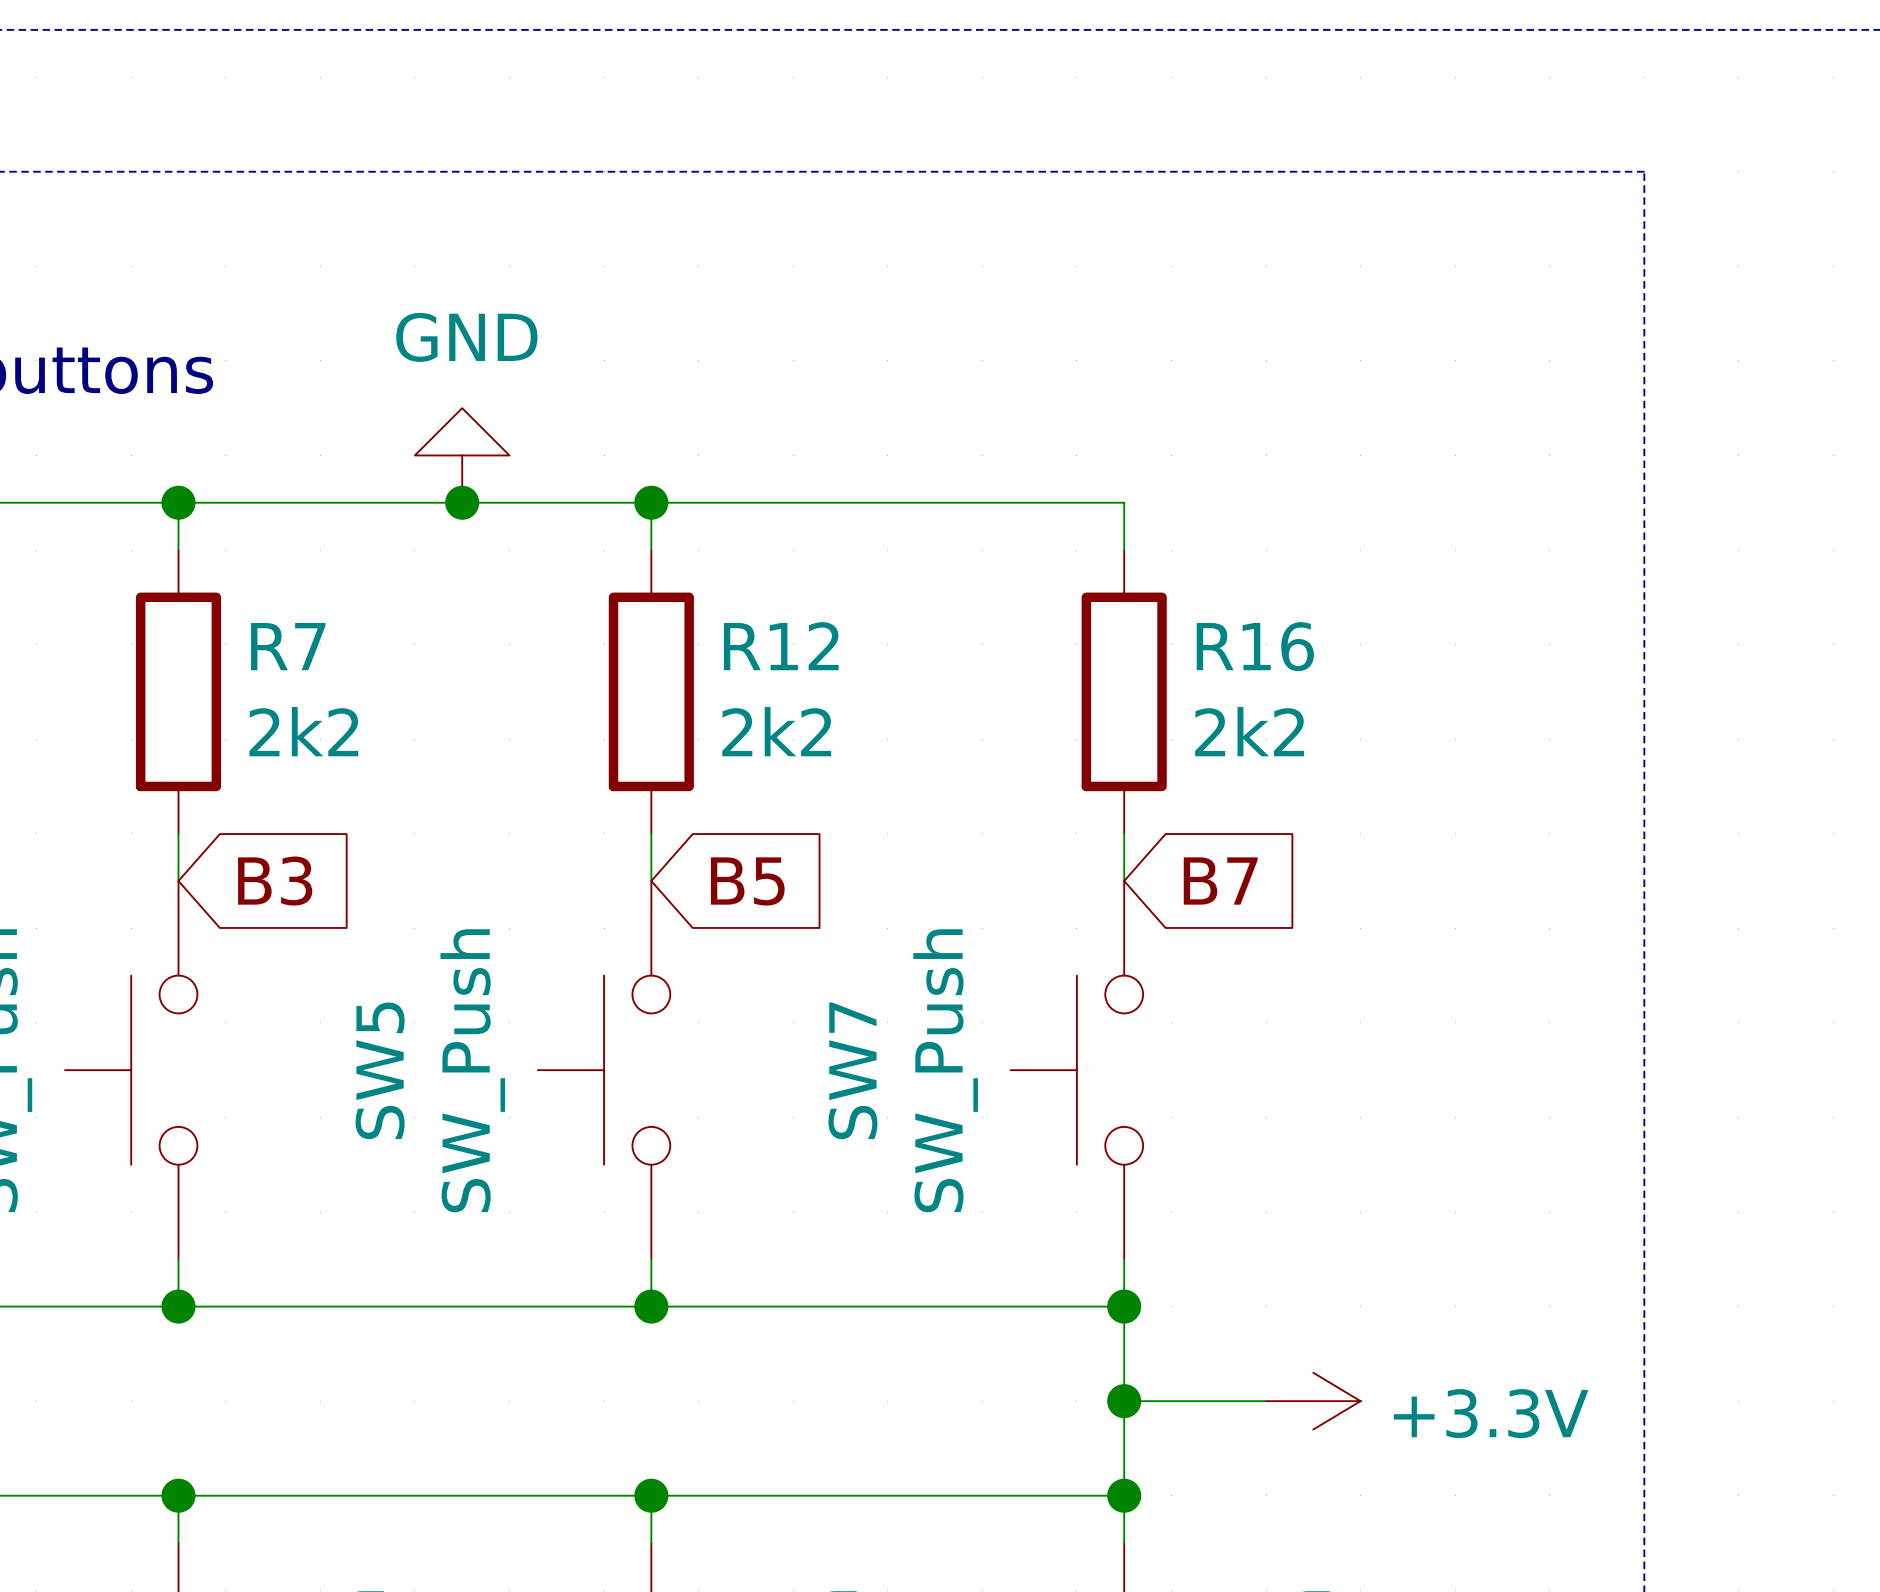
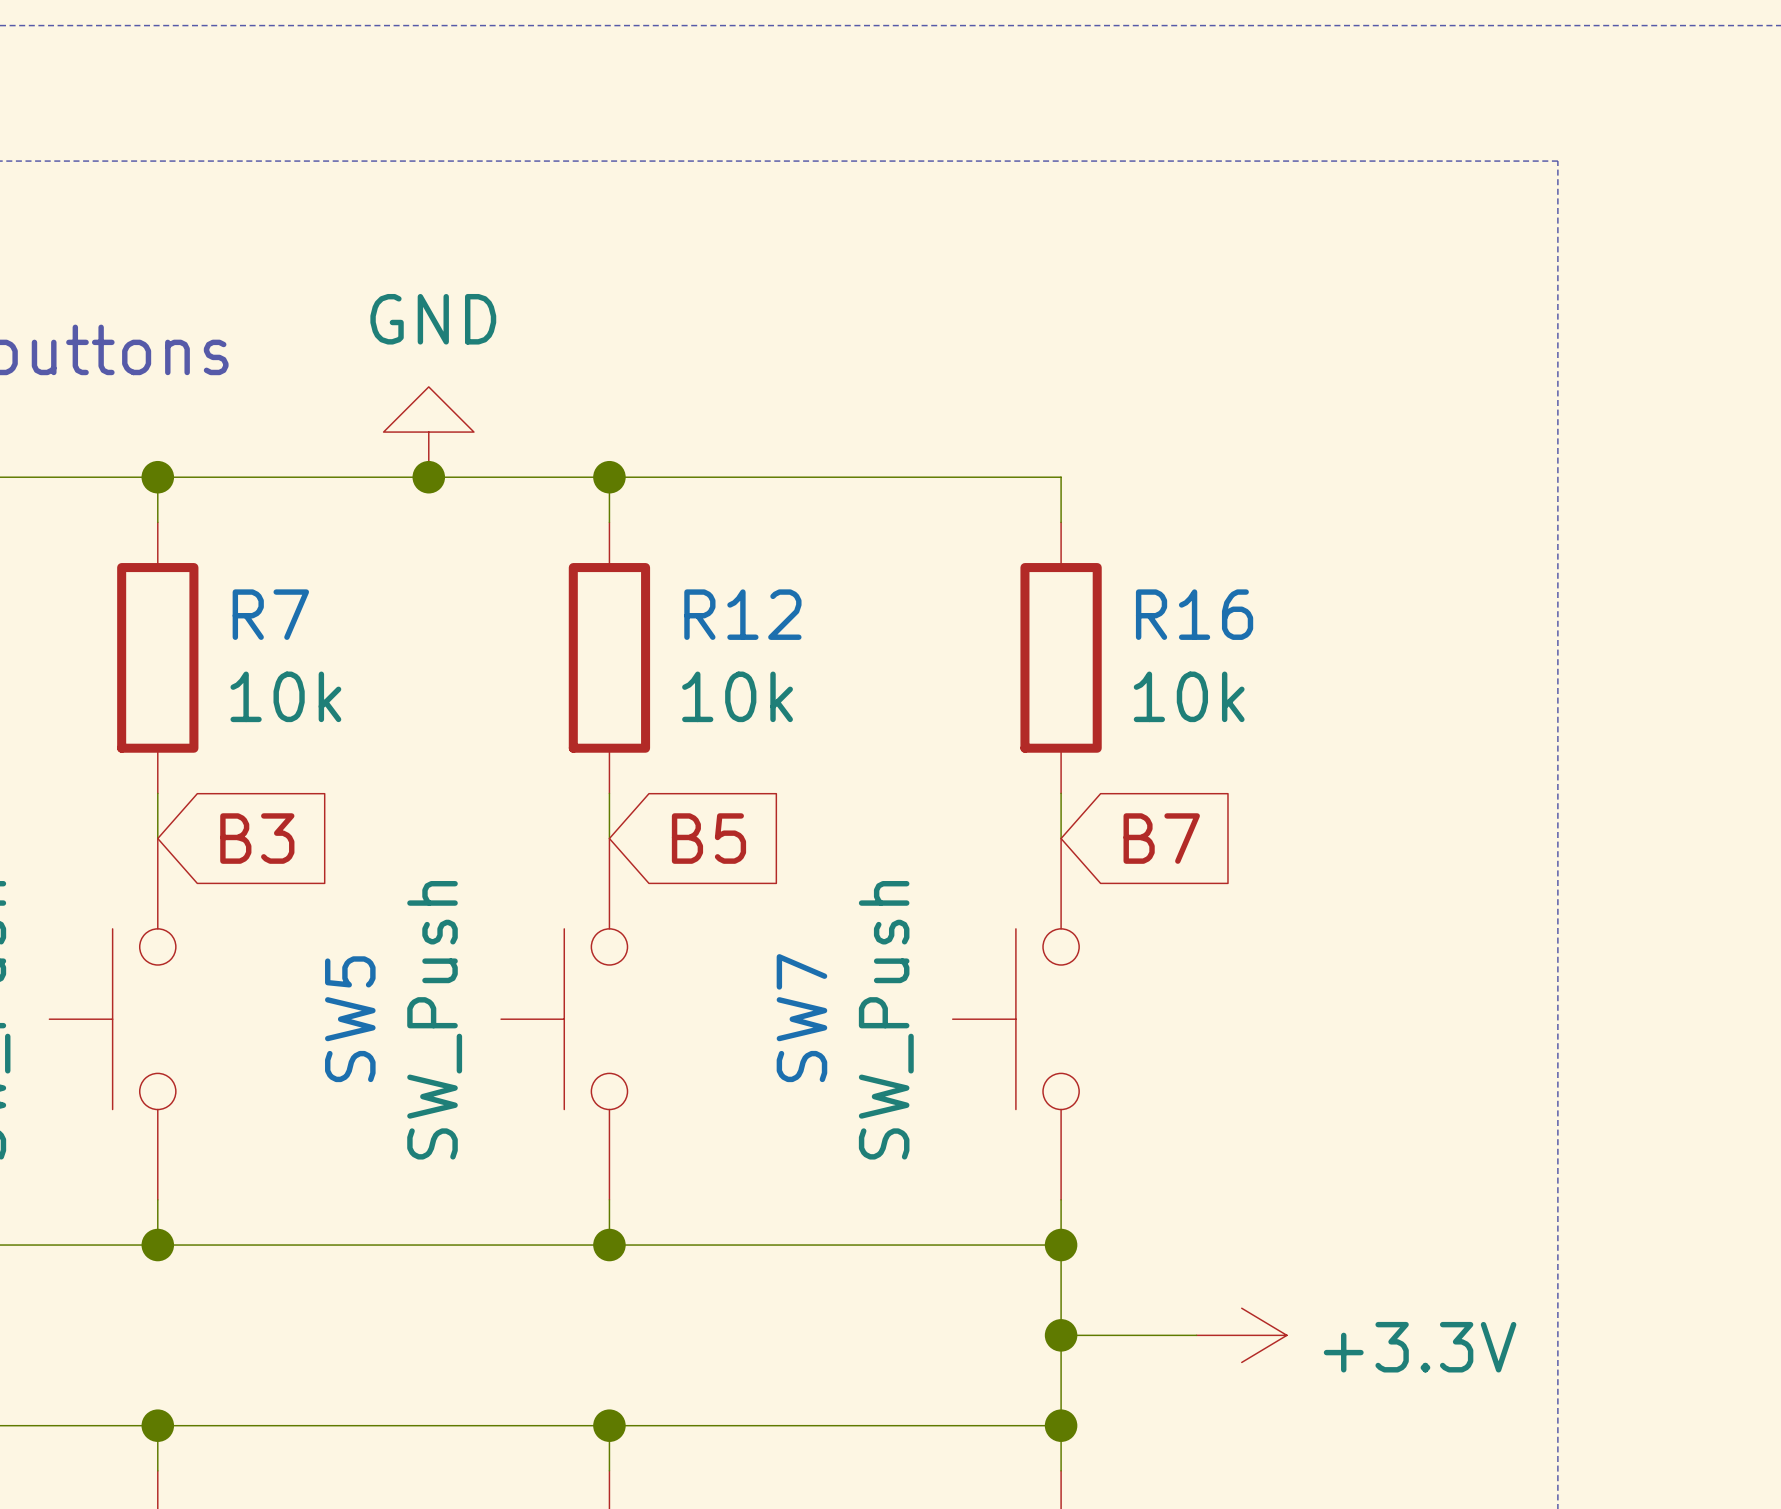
R7 value: 2k2 (303, 731) -> 10k (285, 696)
R12 value: 2k2 (776, 731) -> 10k (737, 696)
R16 value: 2k2 (1249, 731) -> 10k (1189, 696)

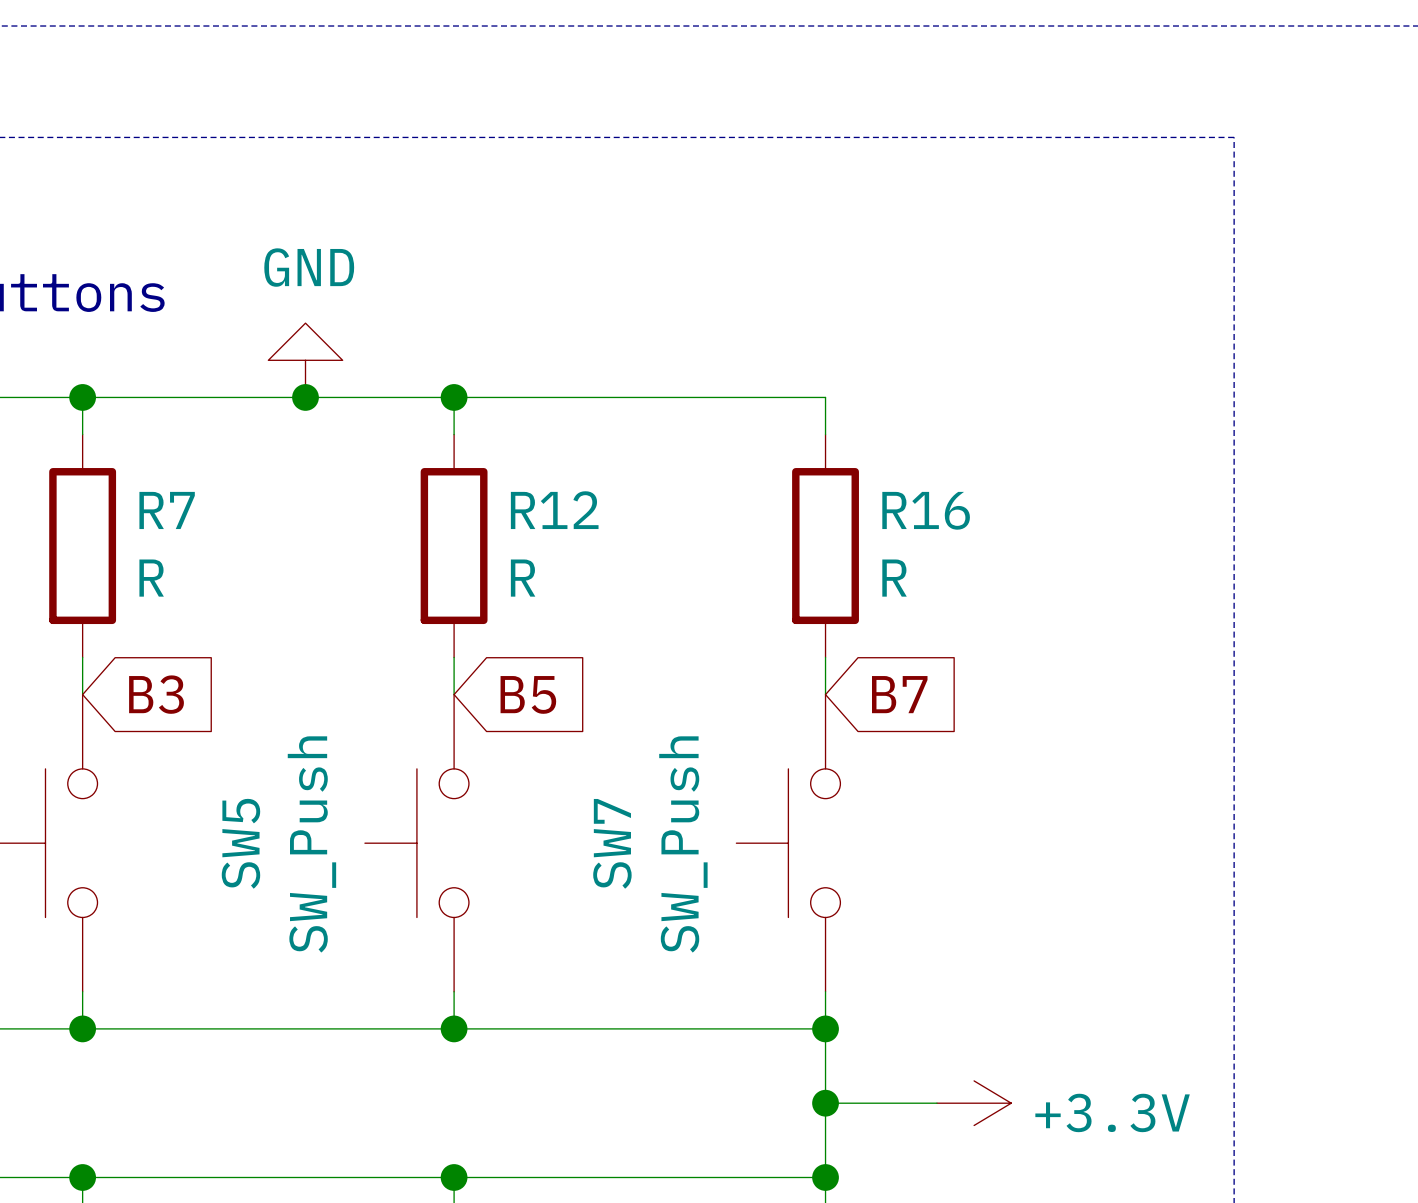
R7 value: 10k (285, 696) -> R (151, 578)
R12 value: 10k (737, 696) -> R (523, 578)
R16 value: 10k (1189, 696) -> R (894, 578)

